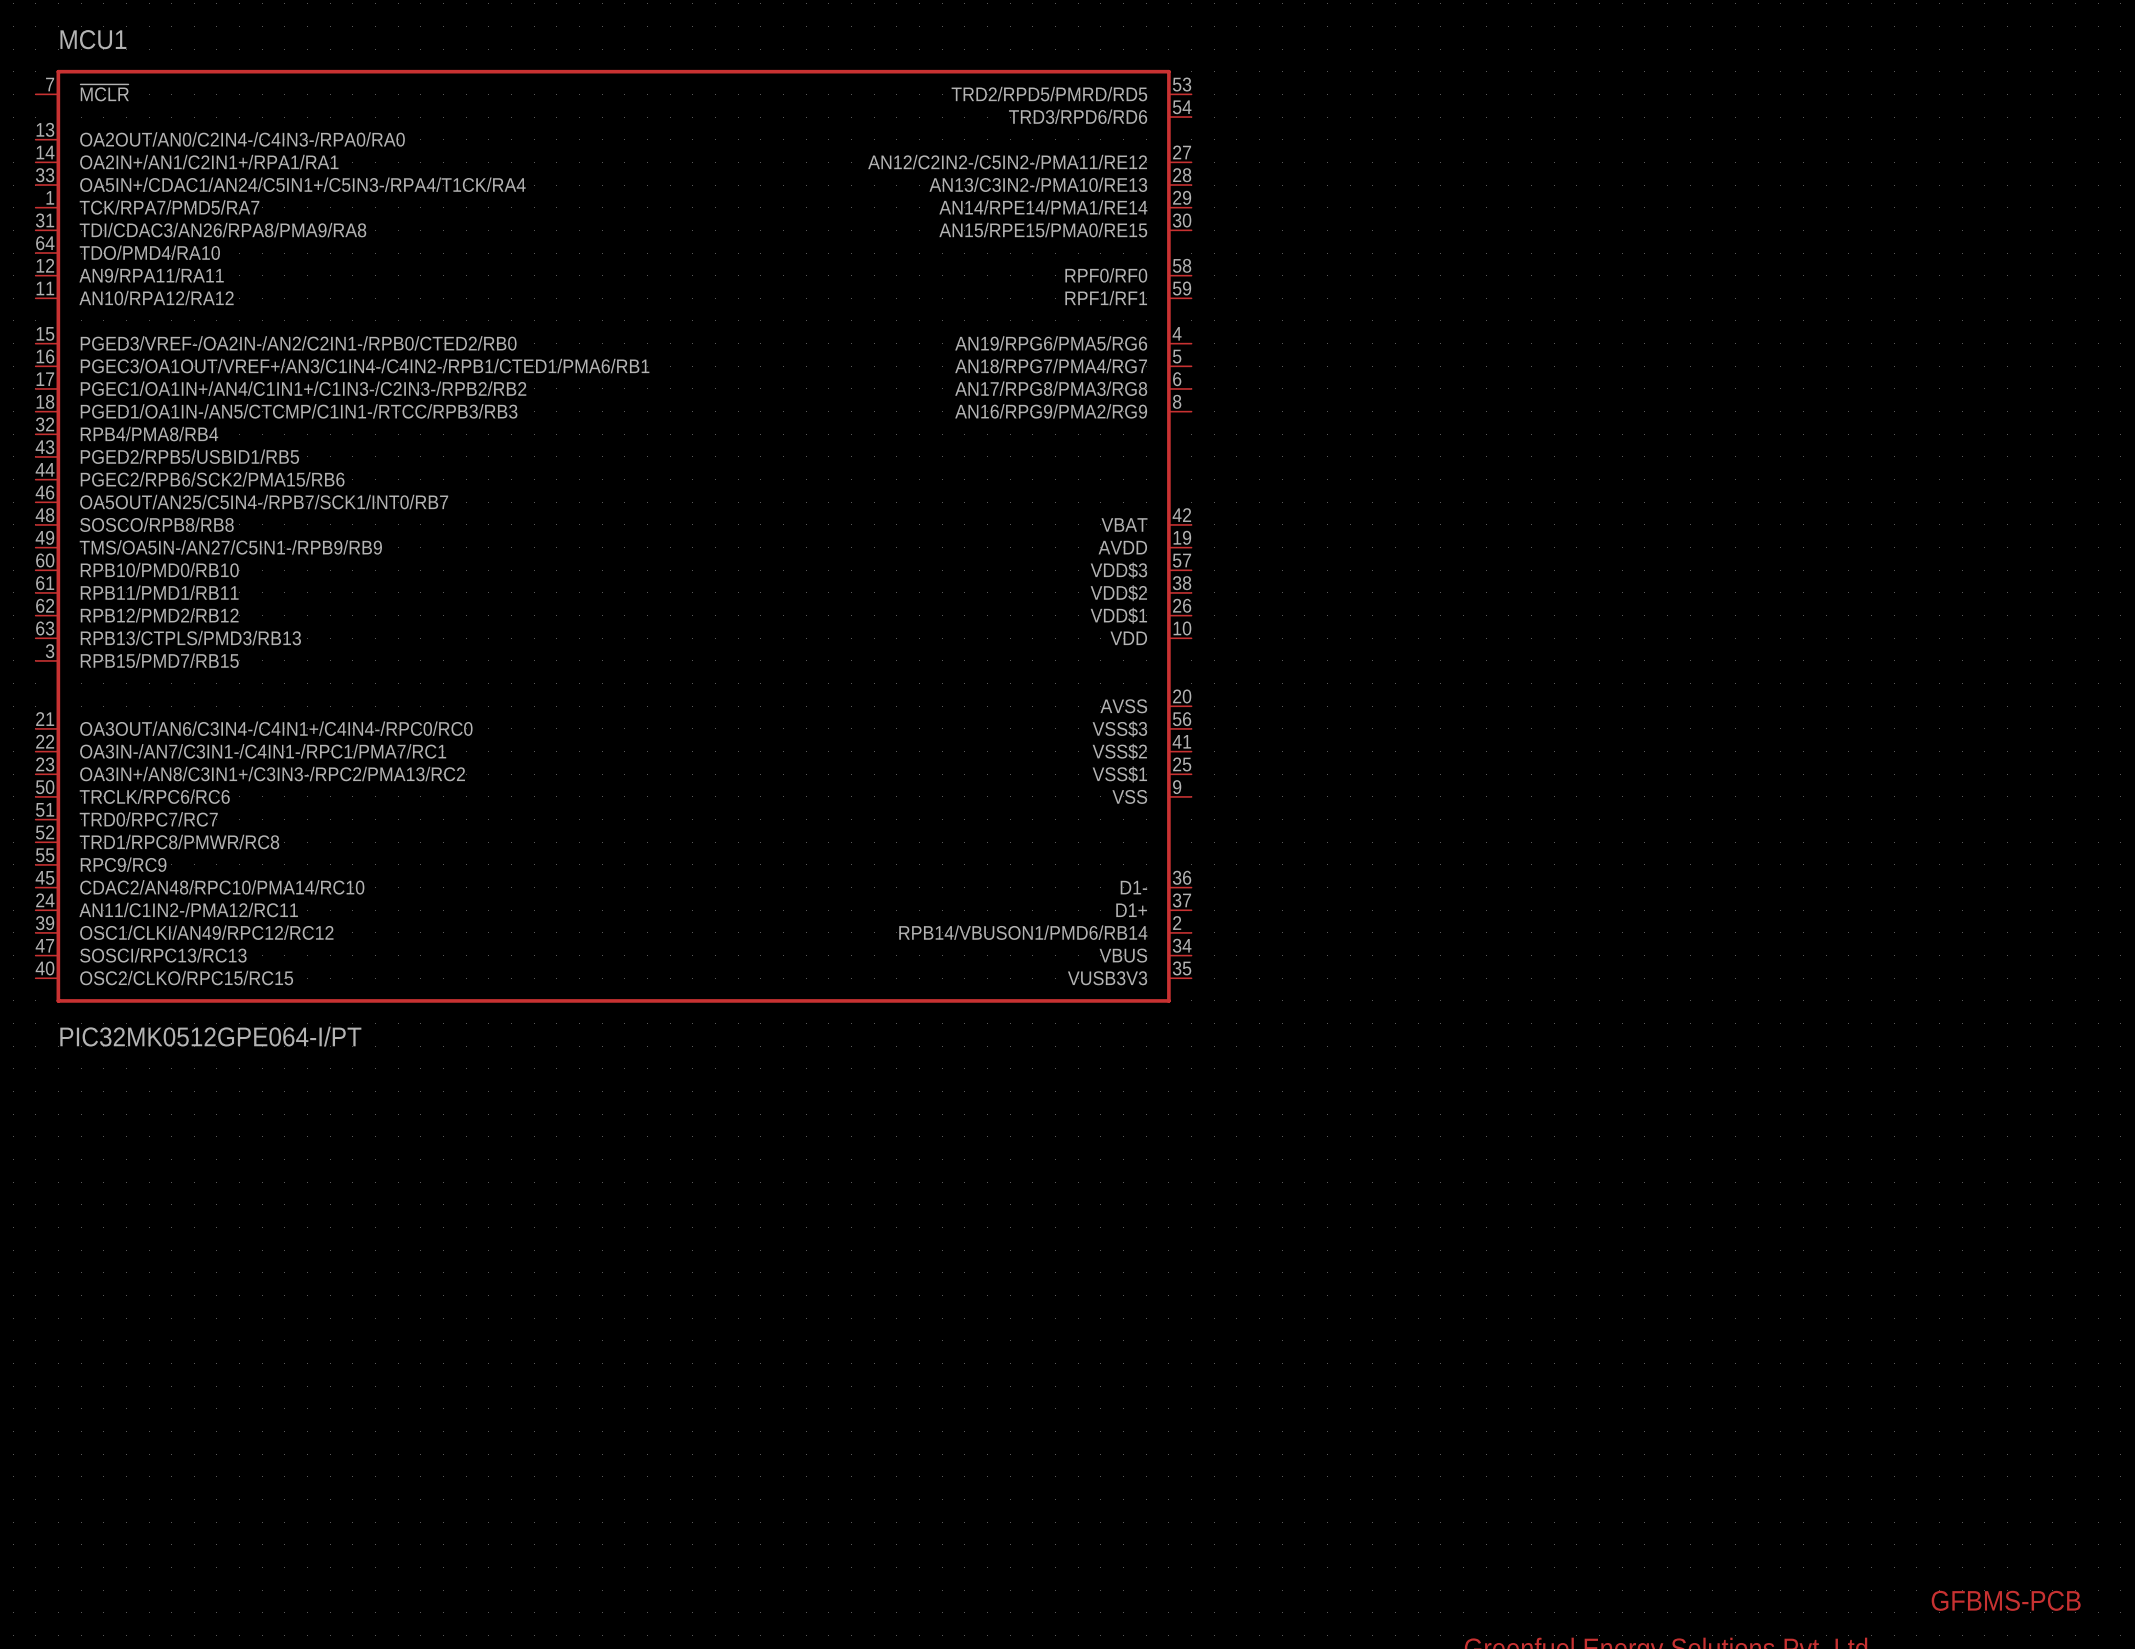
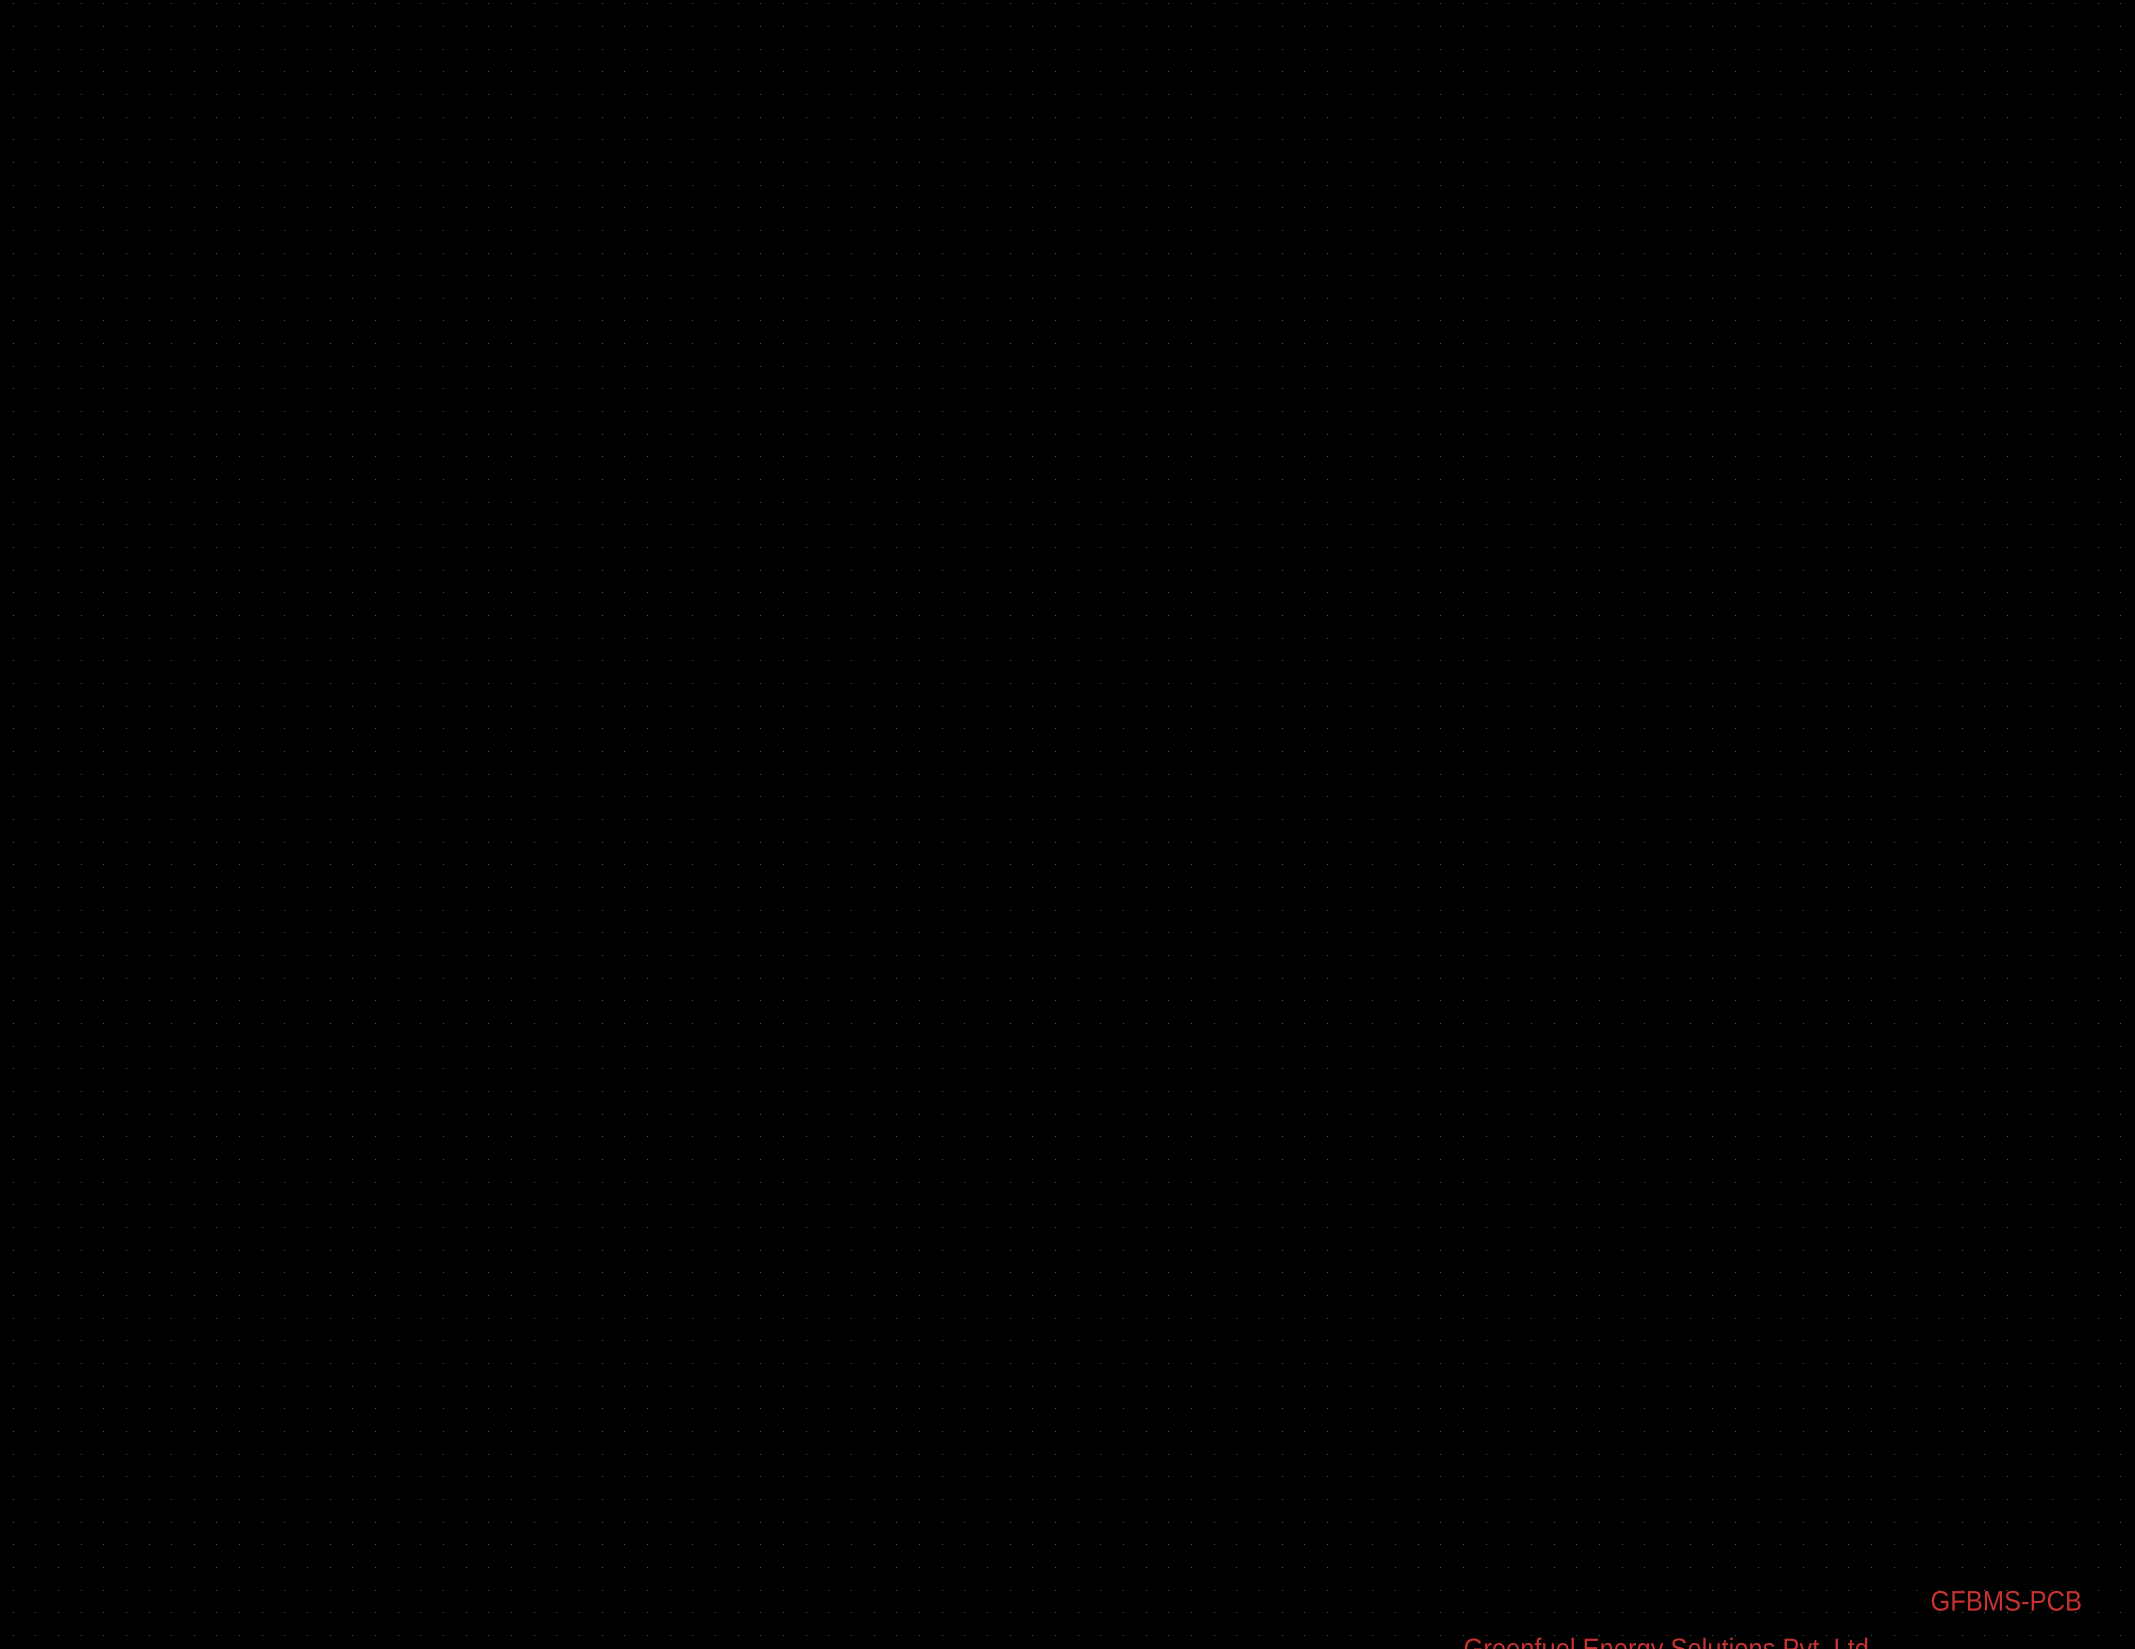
MCU1: PIC32MK0512GPE064-I/PT (613, 536) -> none

